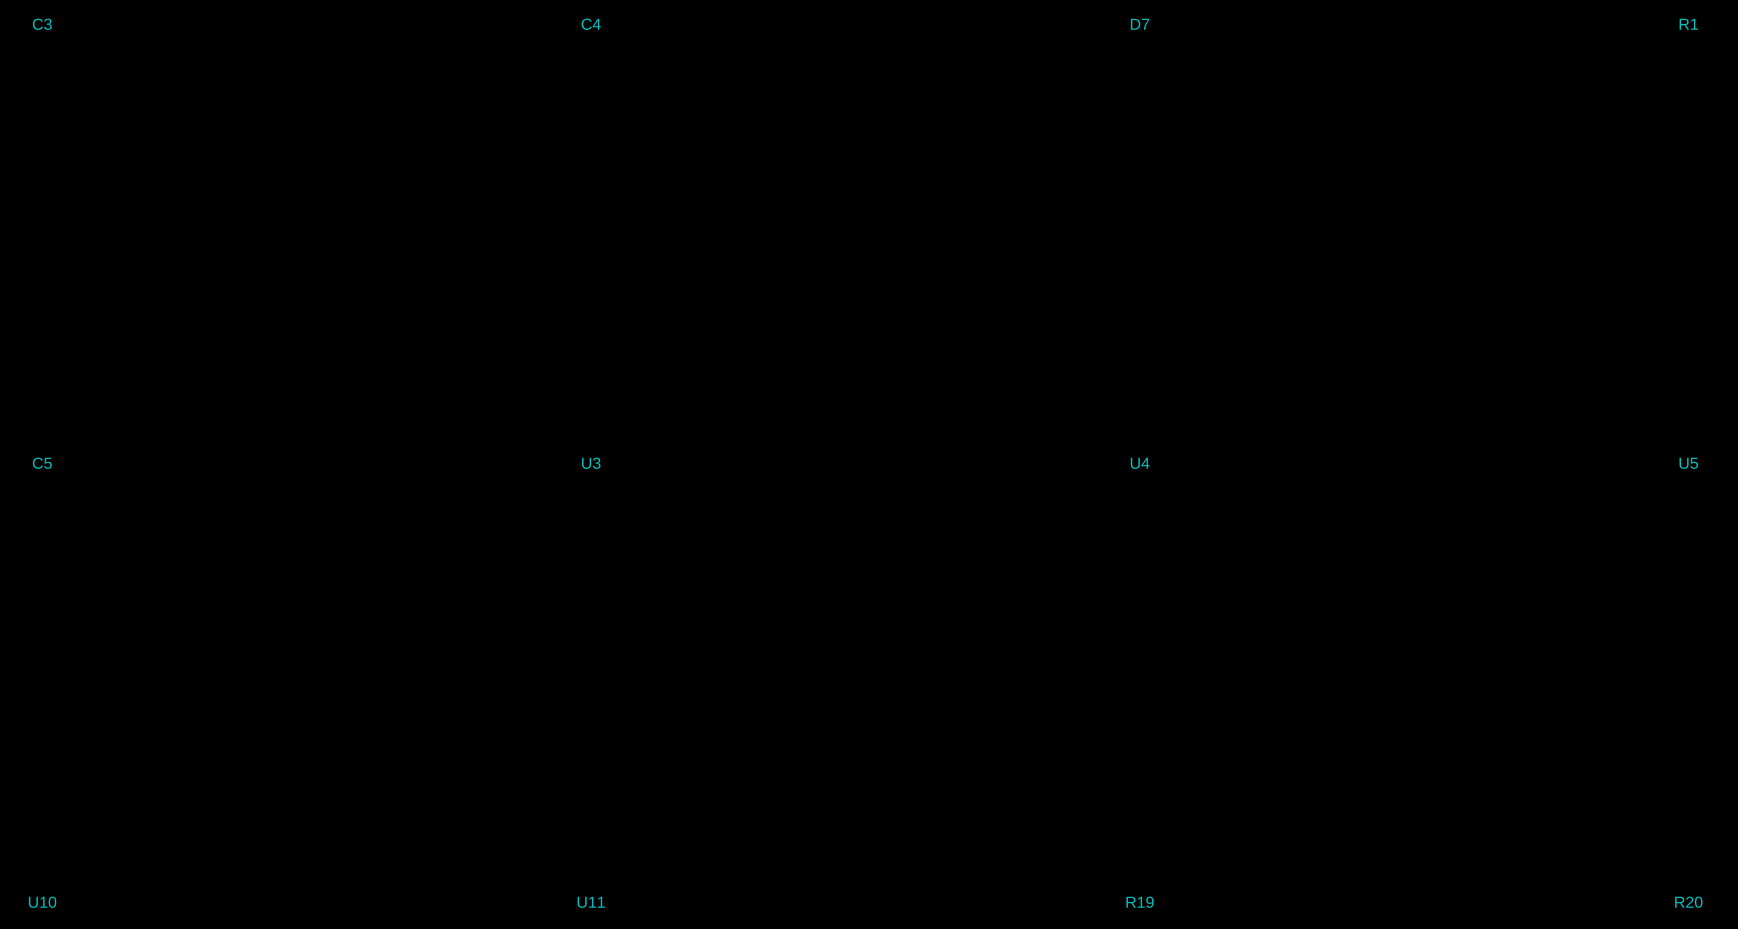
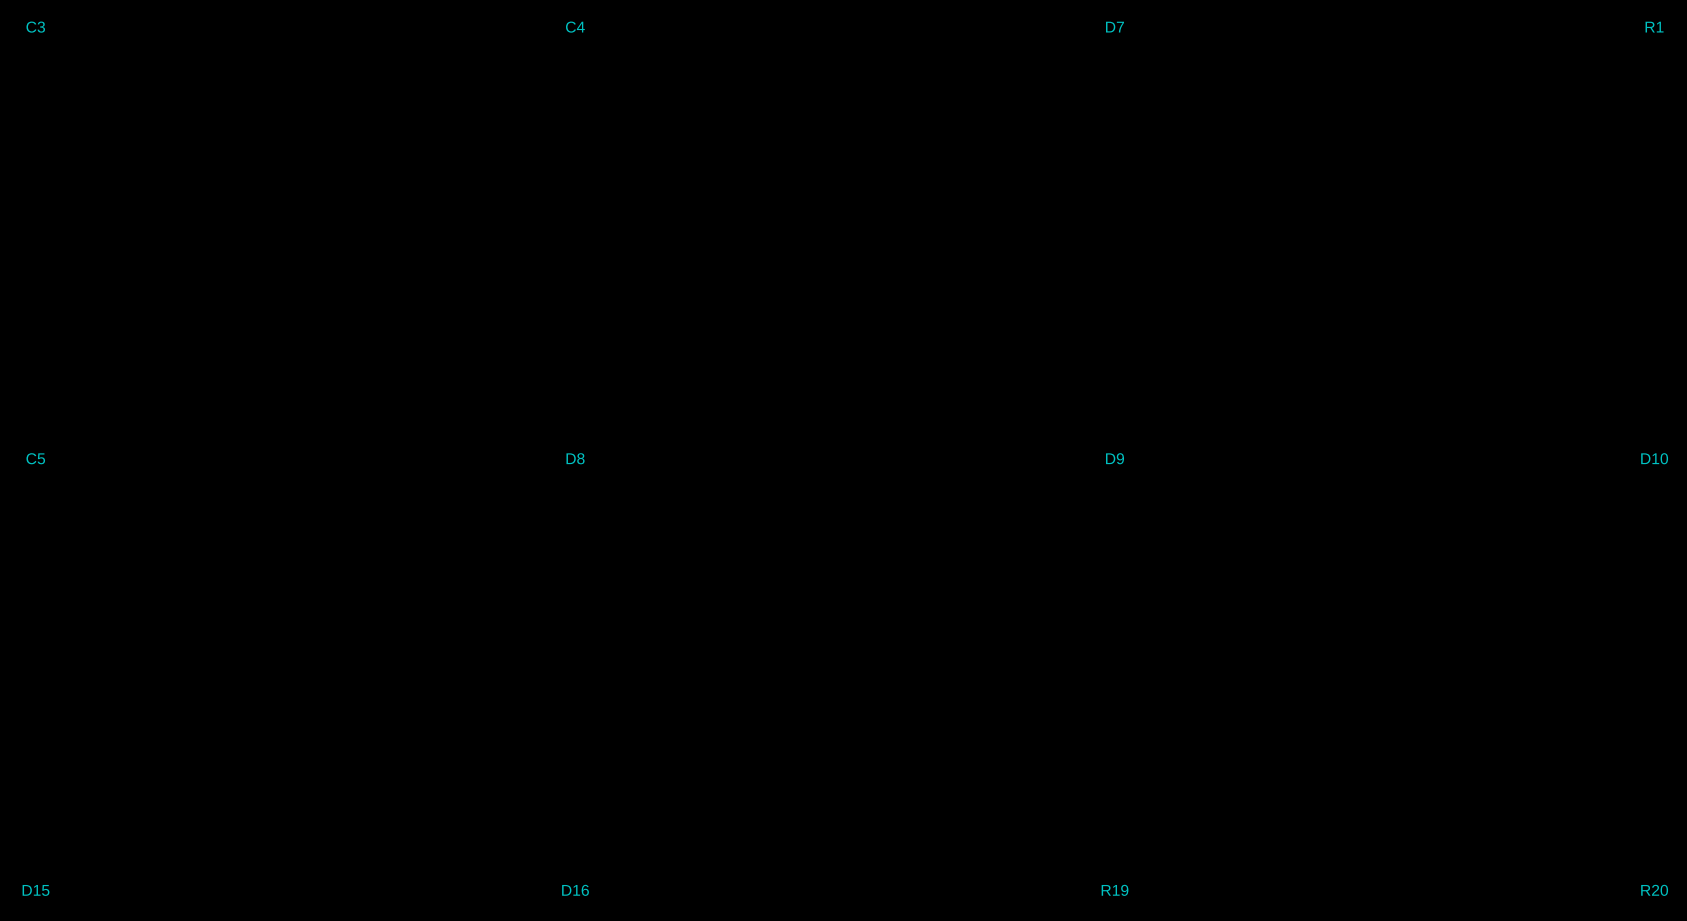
U3 name: U3 (591, 463) -> D8 (575, 458)
U4 name: U4 (1140, 463) -> D9 (1115, 458)
U5 name: U5 (1688, 463) -> D10 (1654, 458)
U10 name: U10 (42, 902) -> D15 (36, 890)
U11 name: U11 (591, 902) -> D16 (575, 890)

